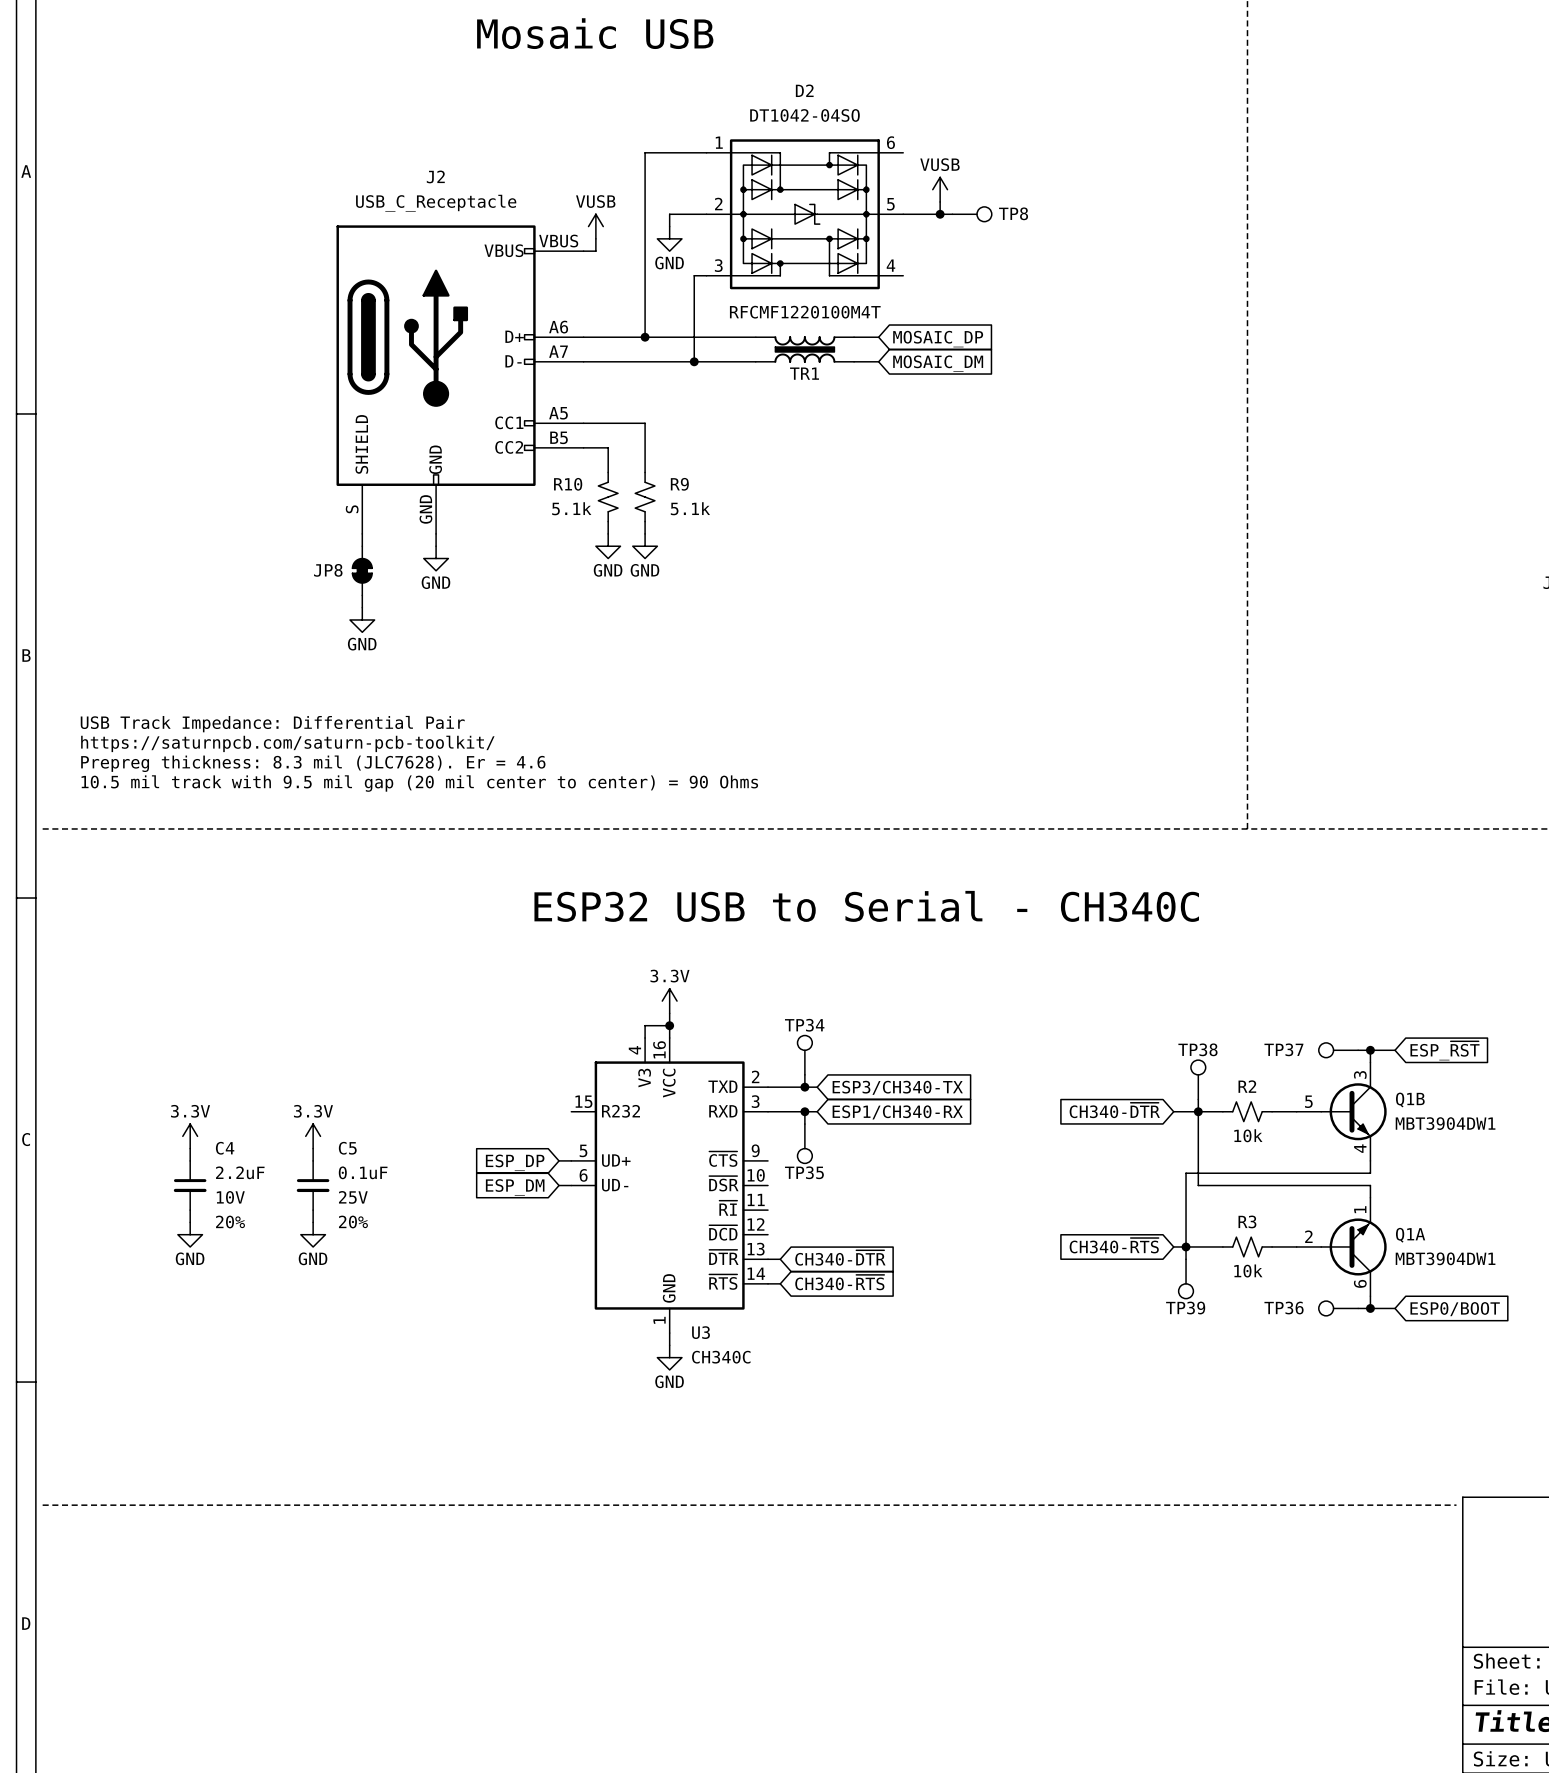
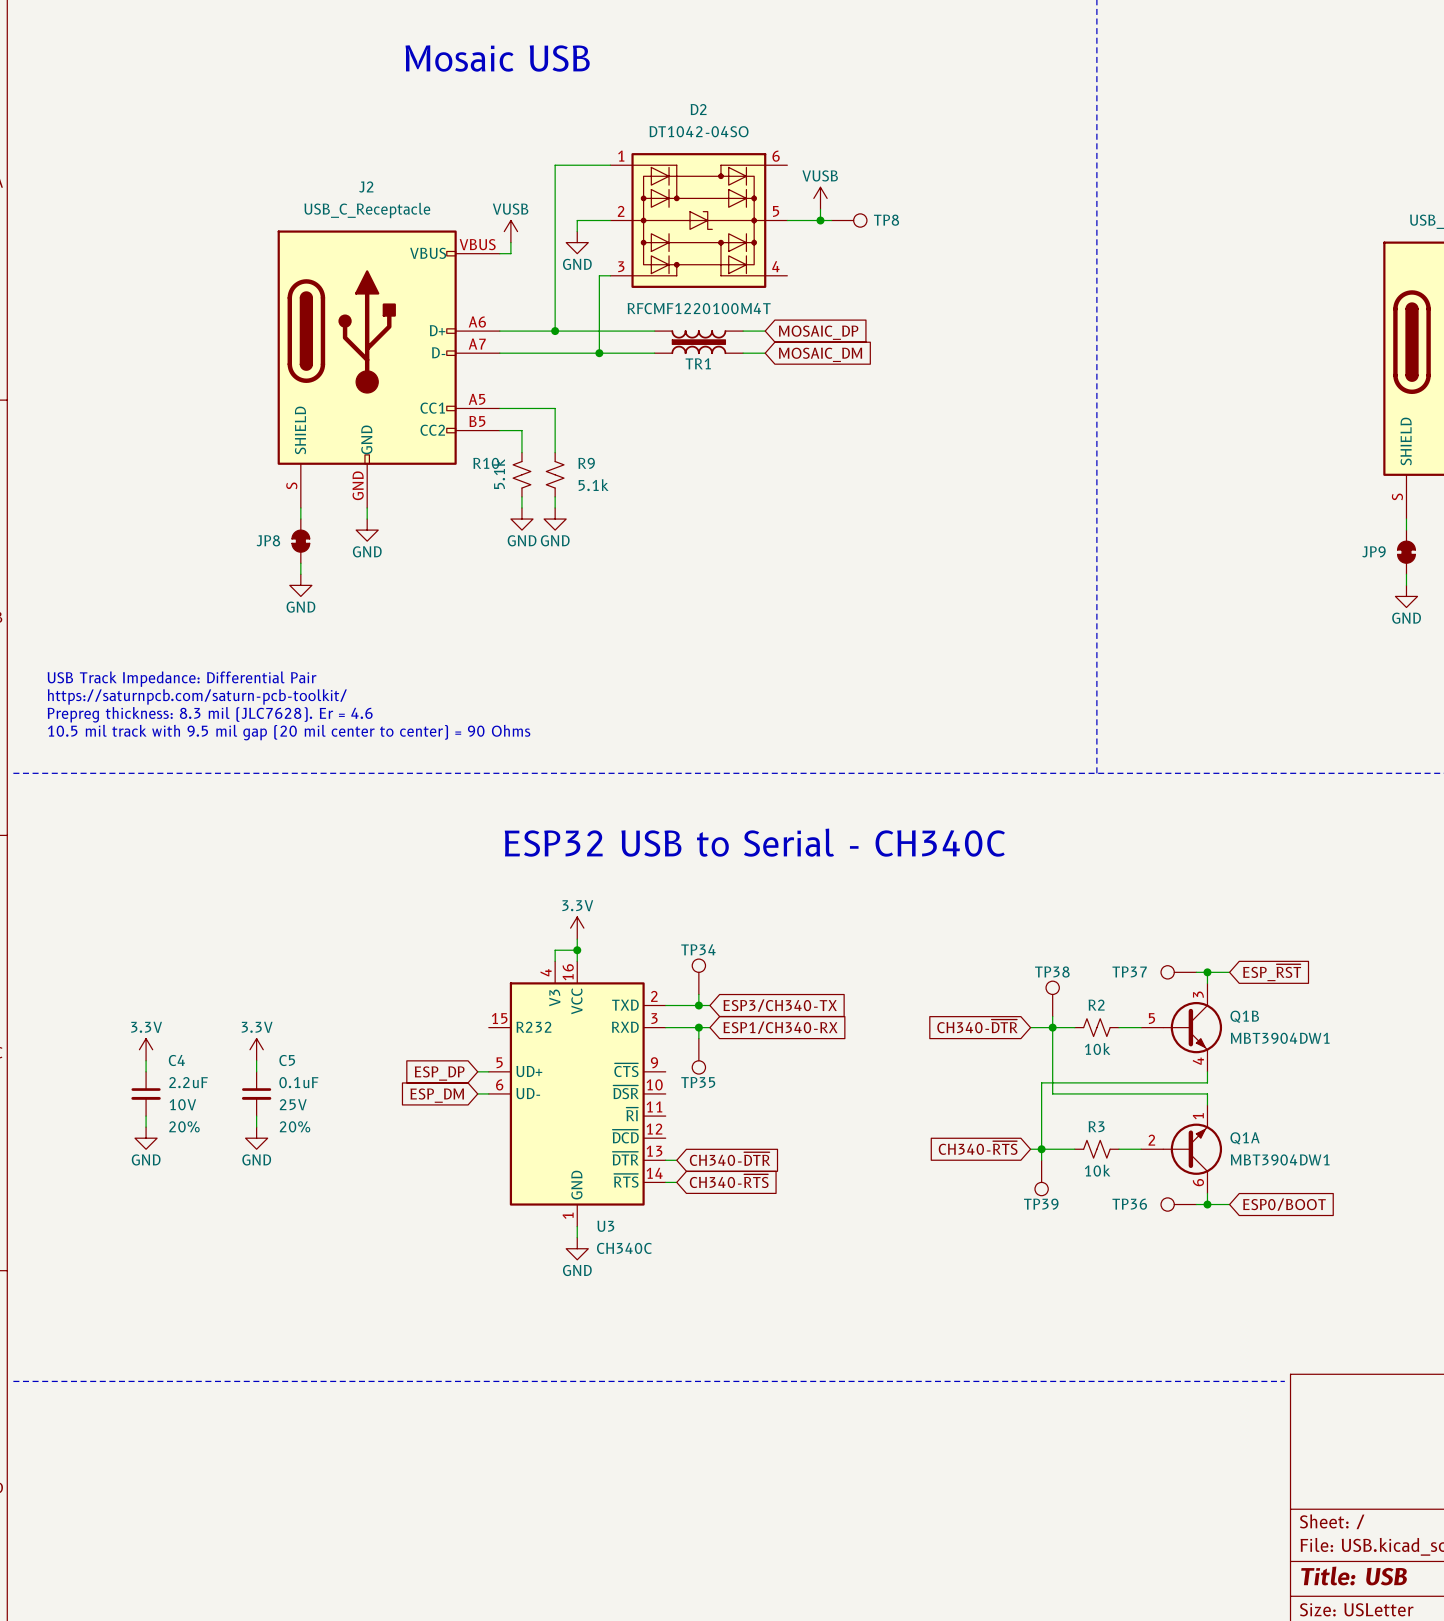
R10 value rotation: 0° (571, 508) -> 90° counterclockwise (499, 474)

